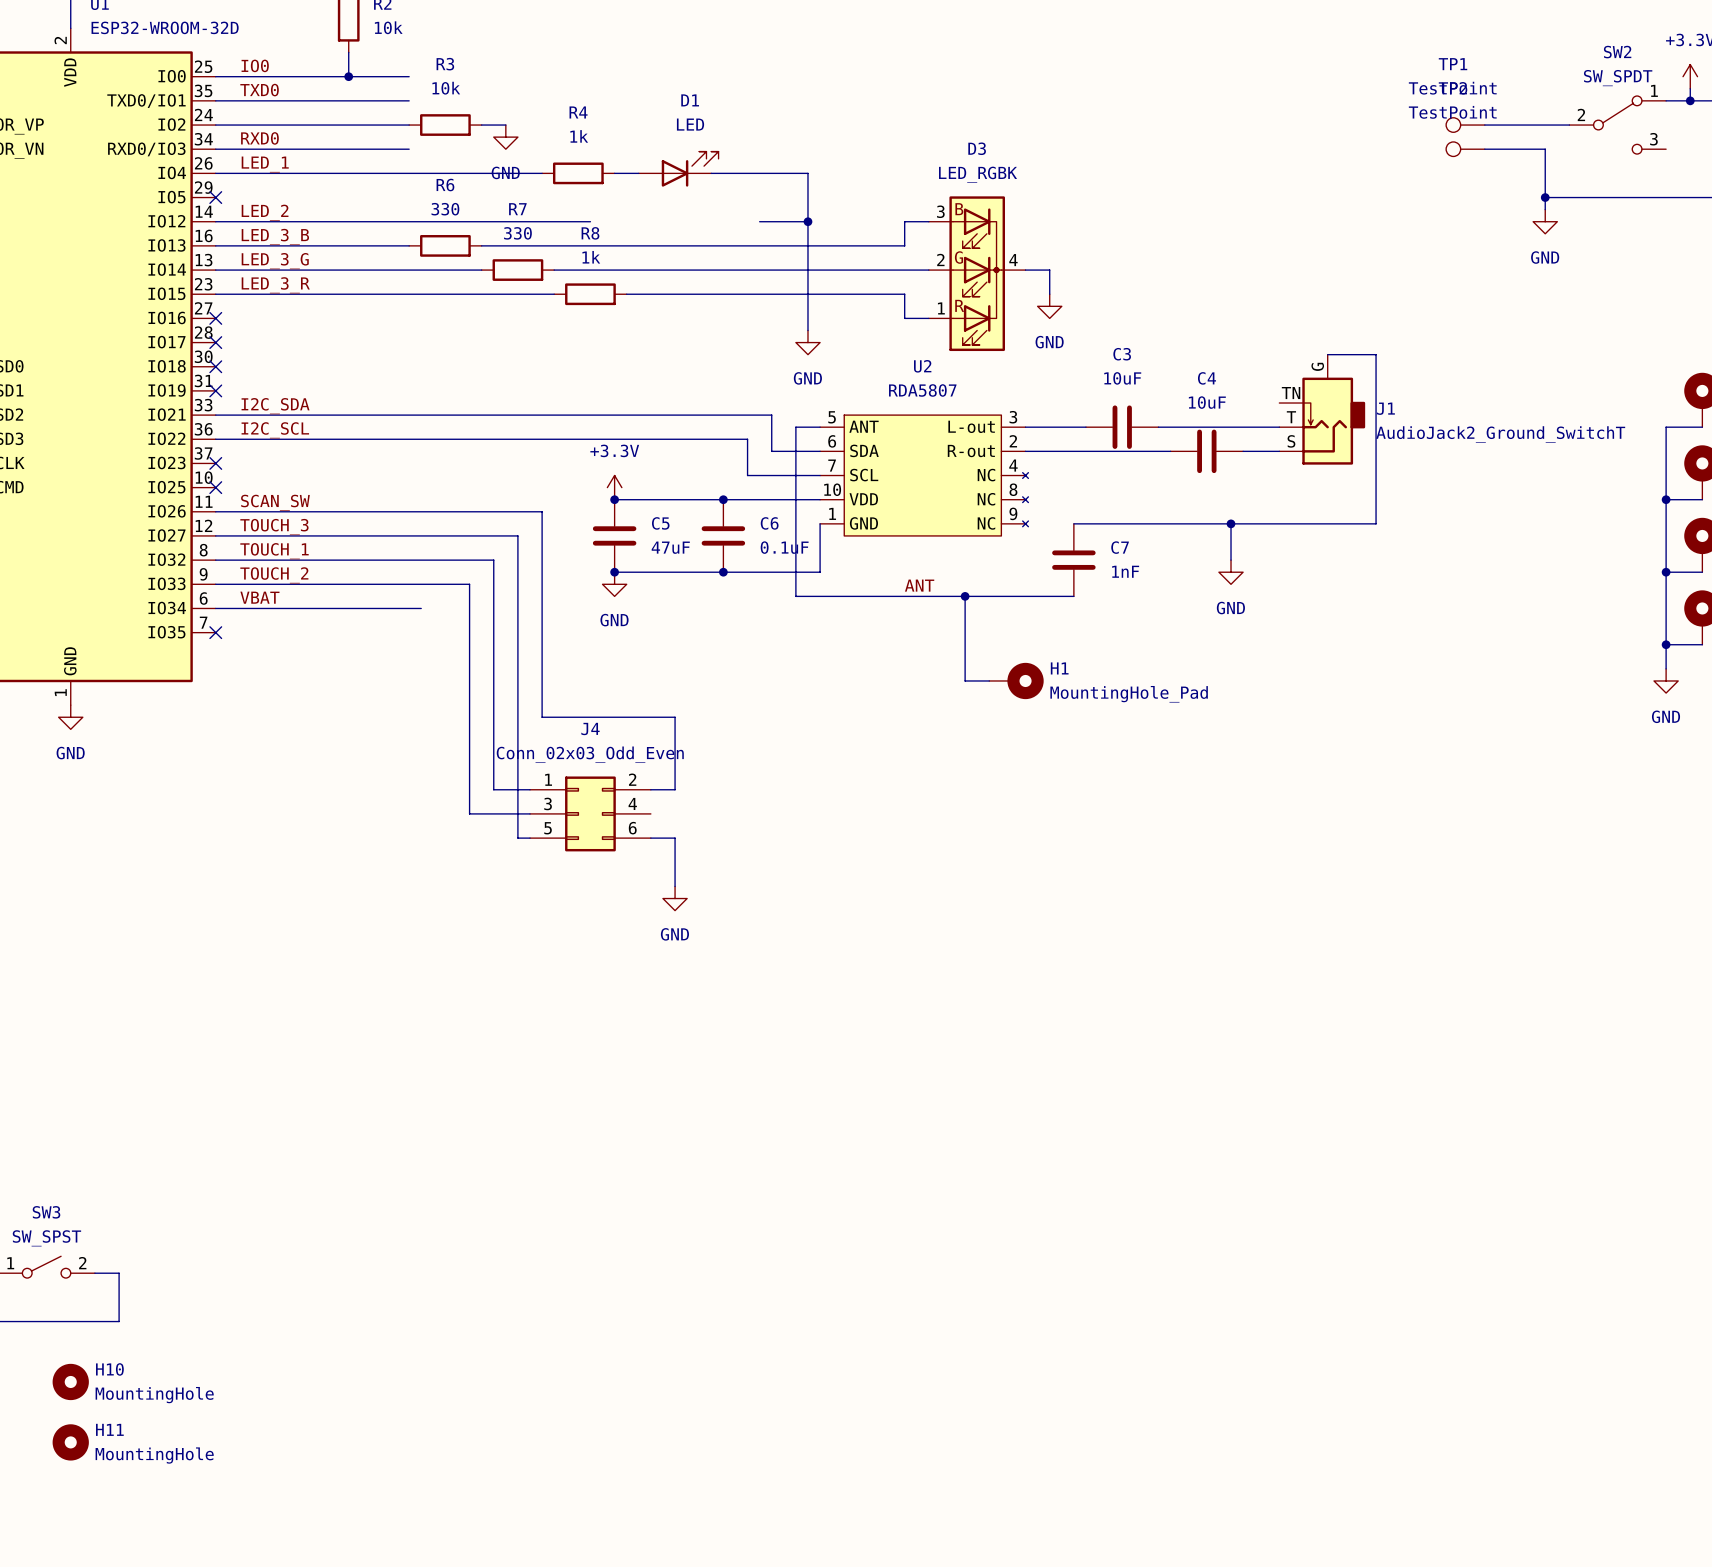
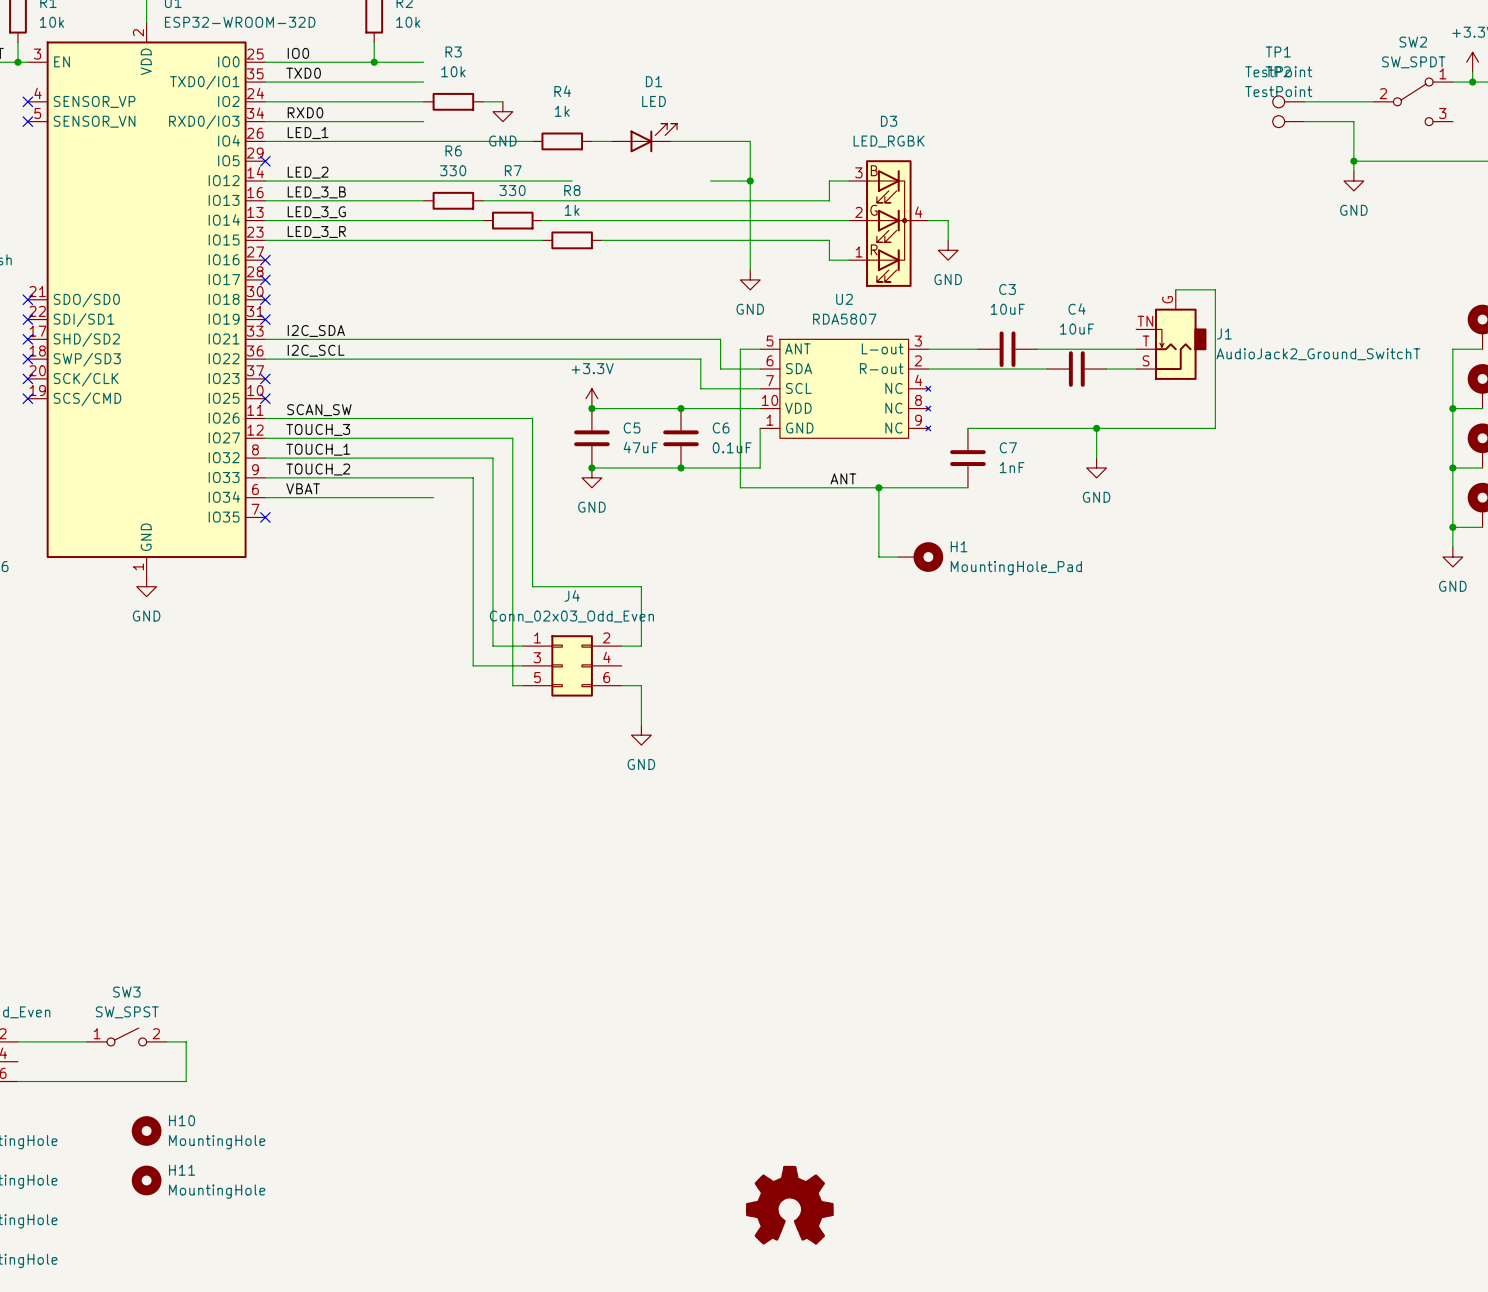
power symbol: none -> (789, 1205)

